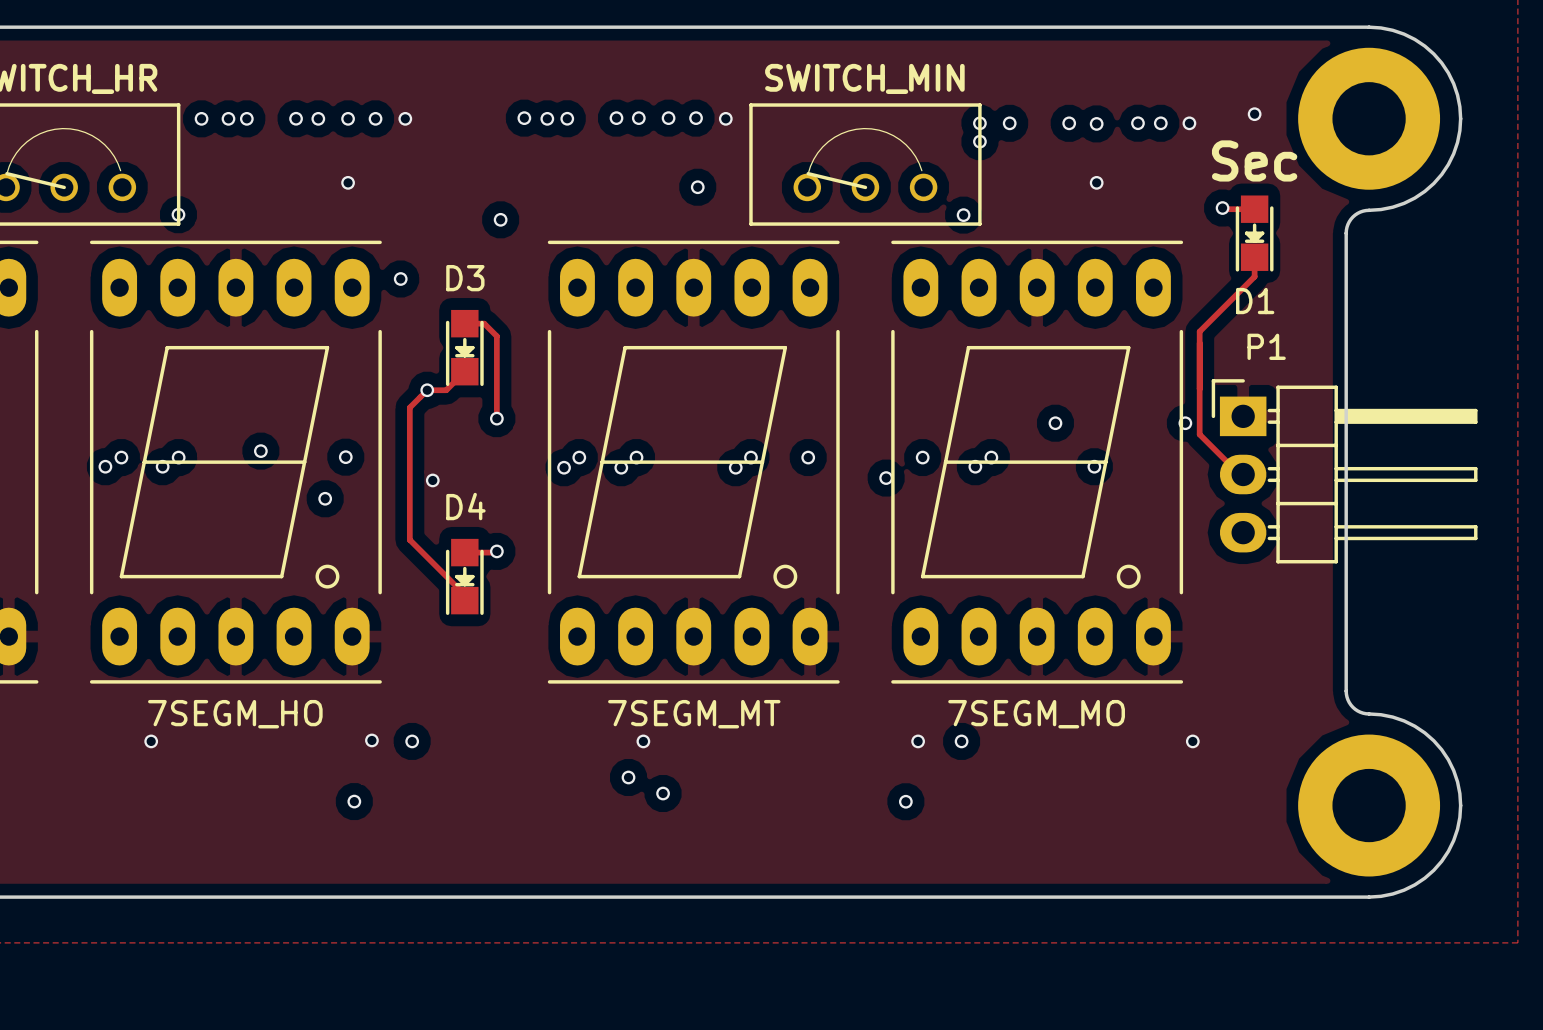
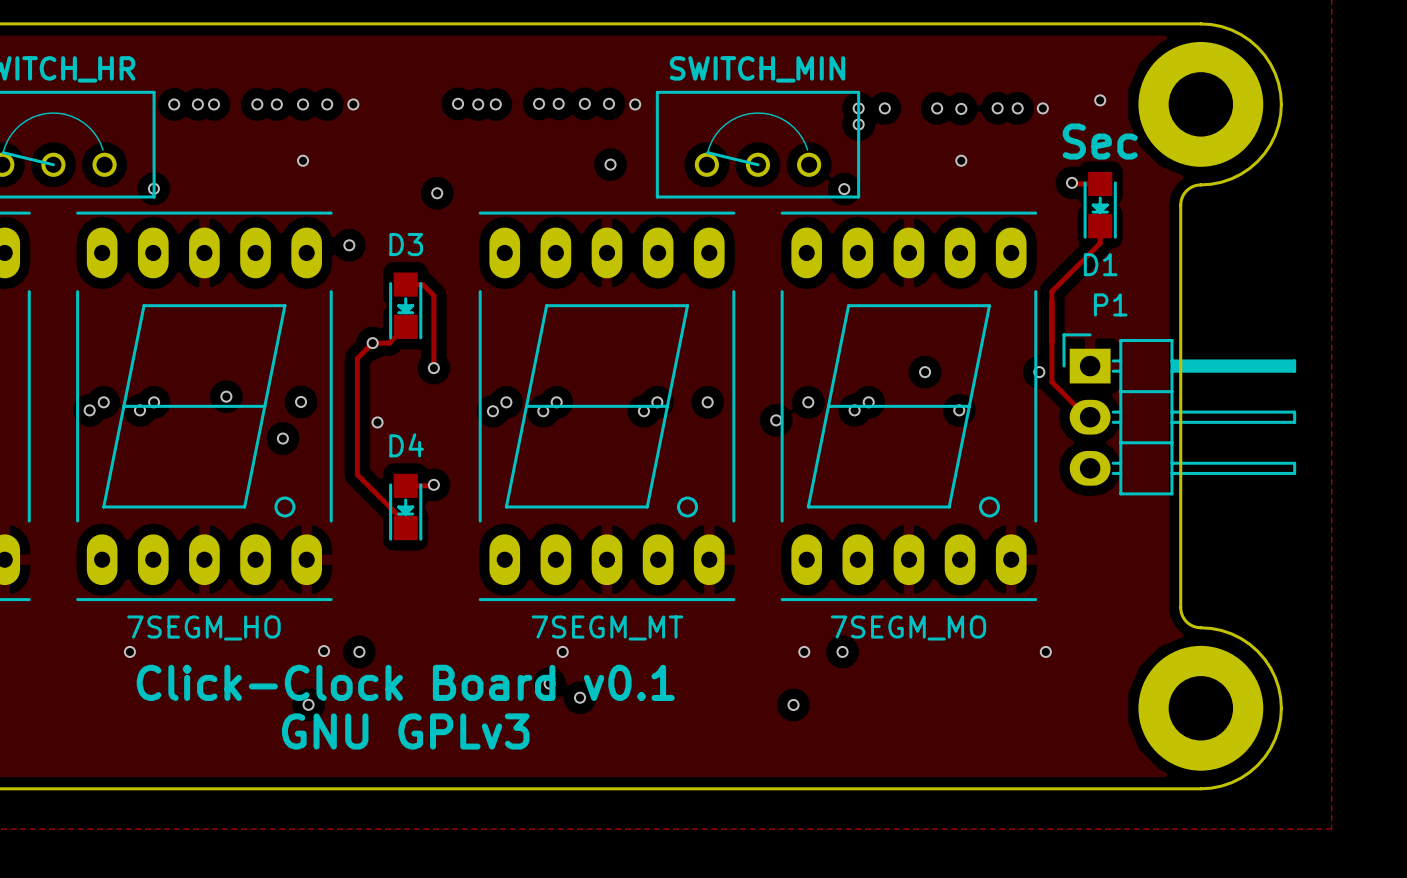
text: none -> Click-Clock Board v0.1 (405, 682)
text: none -> GNU GPLv3 (405, 731)

